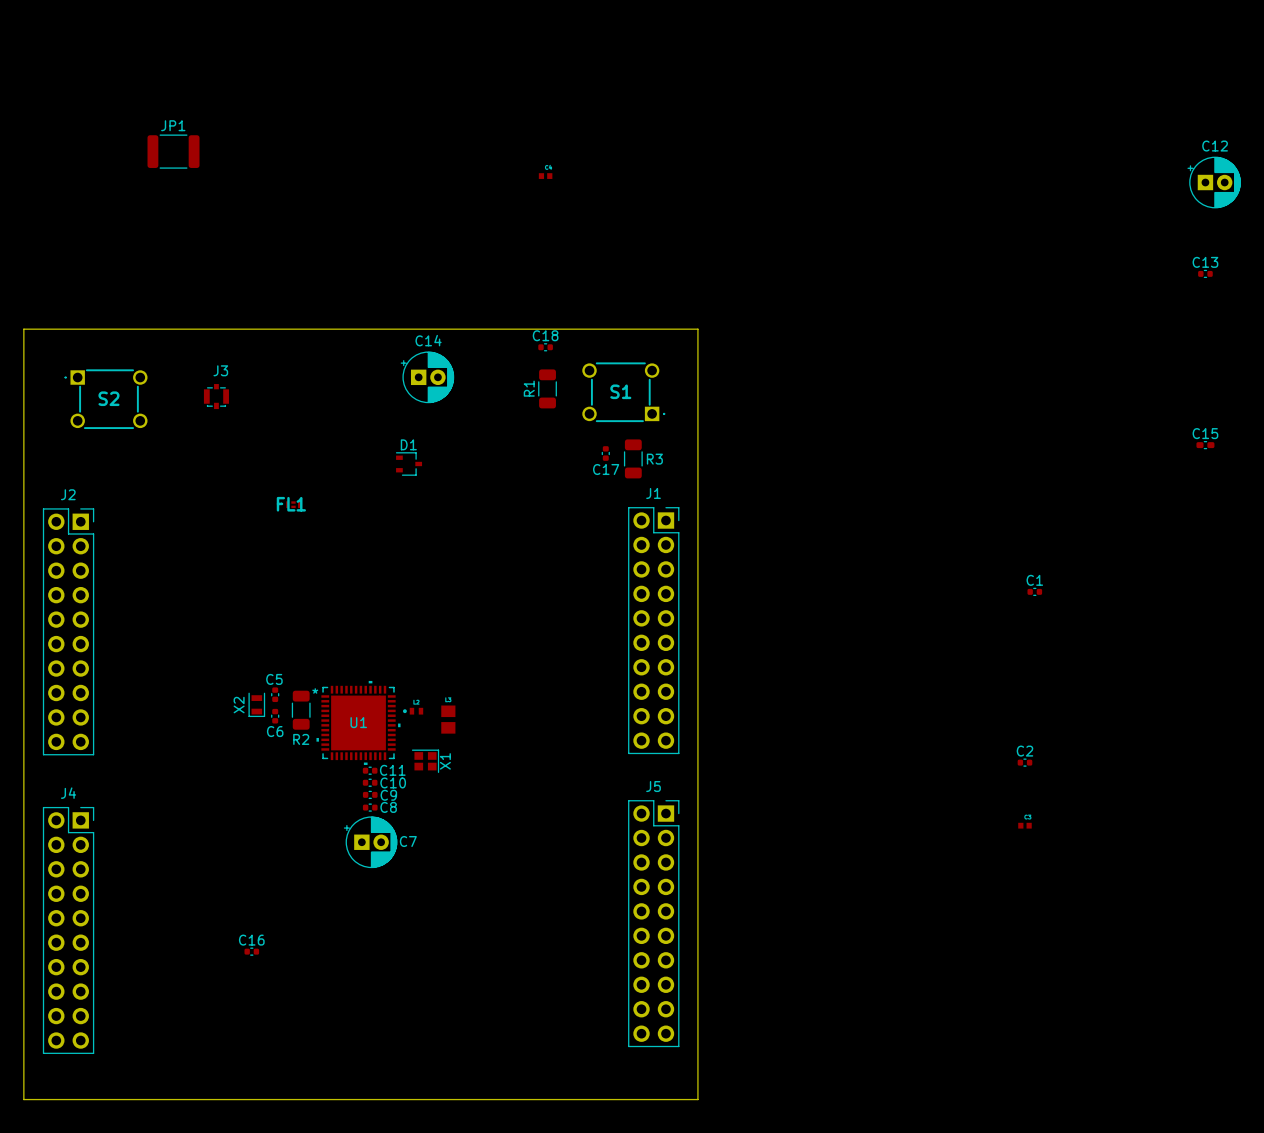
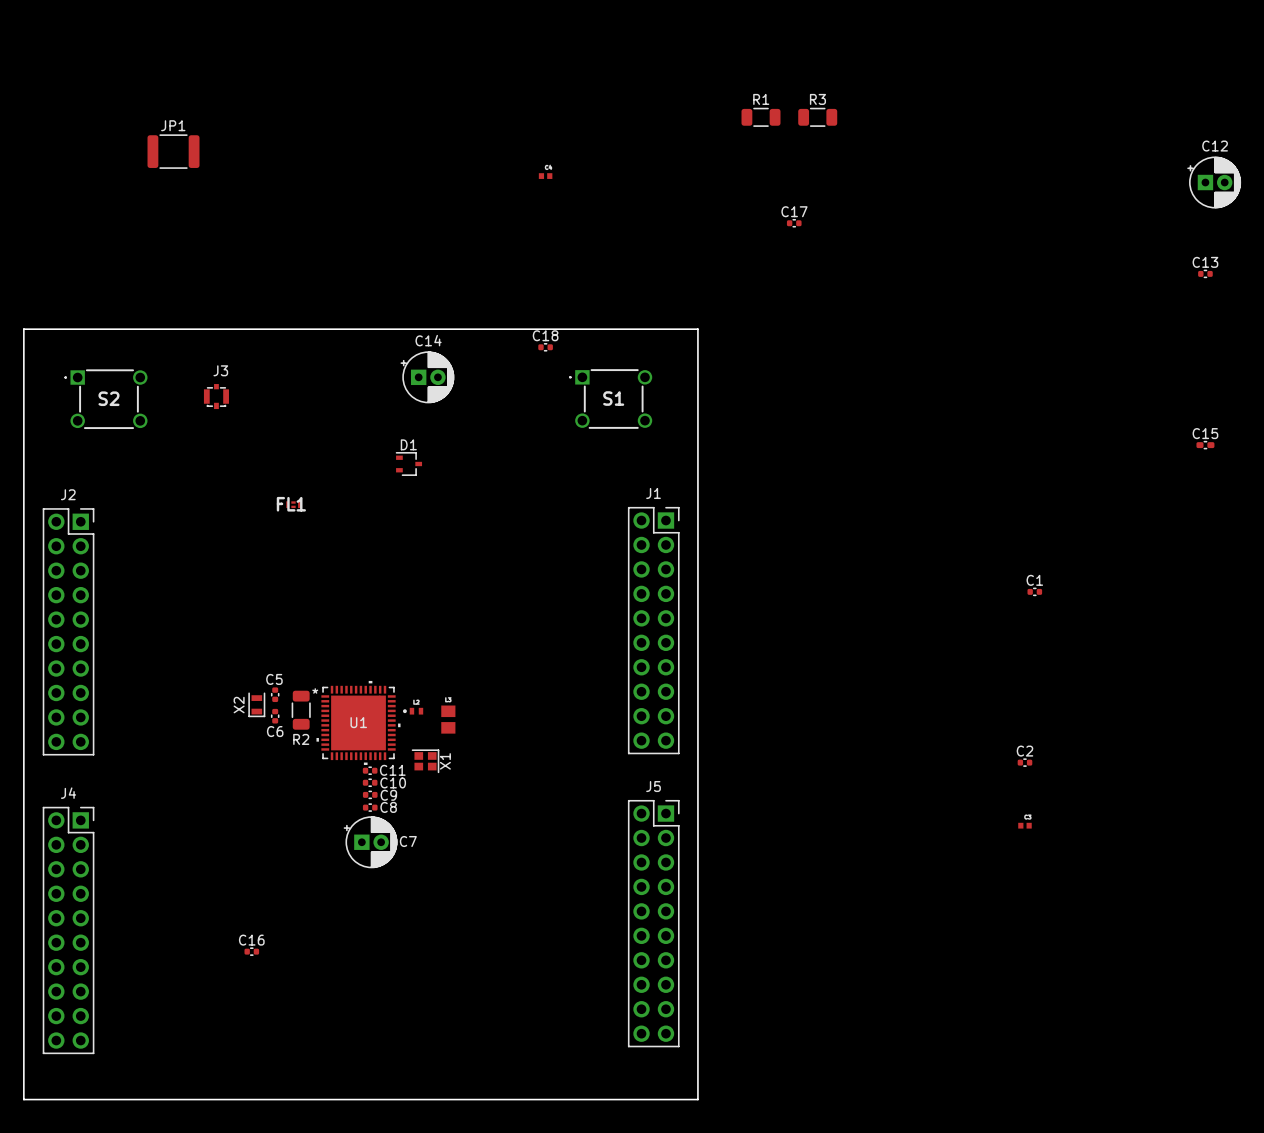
R1 rotation: 0° (547, 388) -> 90° clockwise (761, 117)
R1 position: (547, 388) -> (761, 117)
S1 rotation: 0° (623, 392) -> 180° (610, 398)
C17 rotation: 0° (605, 453) -> 90° clockwise (794, 223)
C17 position: (605, 453) -> (794, 223)
R3 rotation: 0° (633, 458) -> 90° clockwise (817, 117)
R3 position: (633, 458) -> (817, 117)
R3 name position: R3 (654, 459) -> R3 (817, 99)
C17 name position: C17 (606, 469) -> C17 (794, 211)

